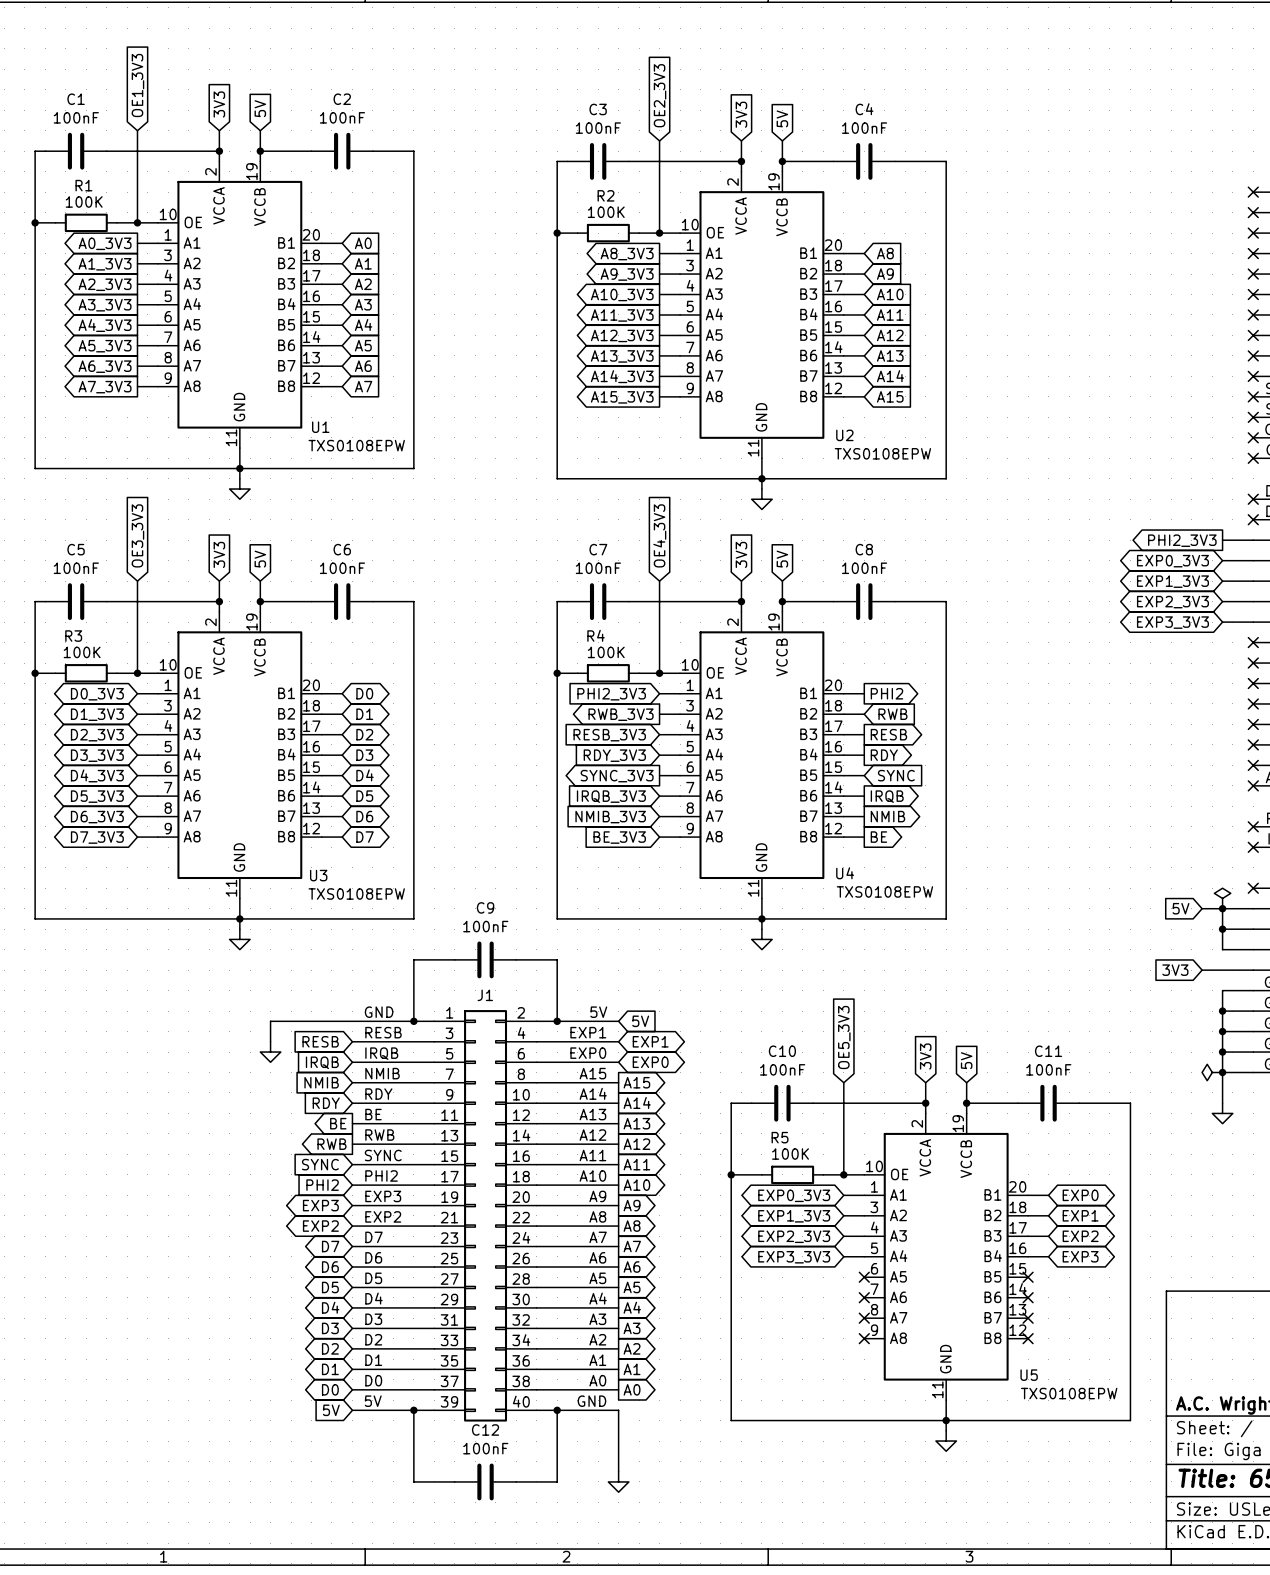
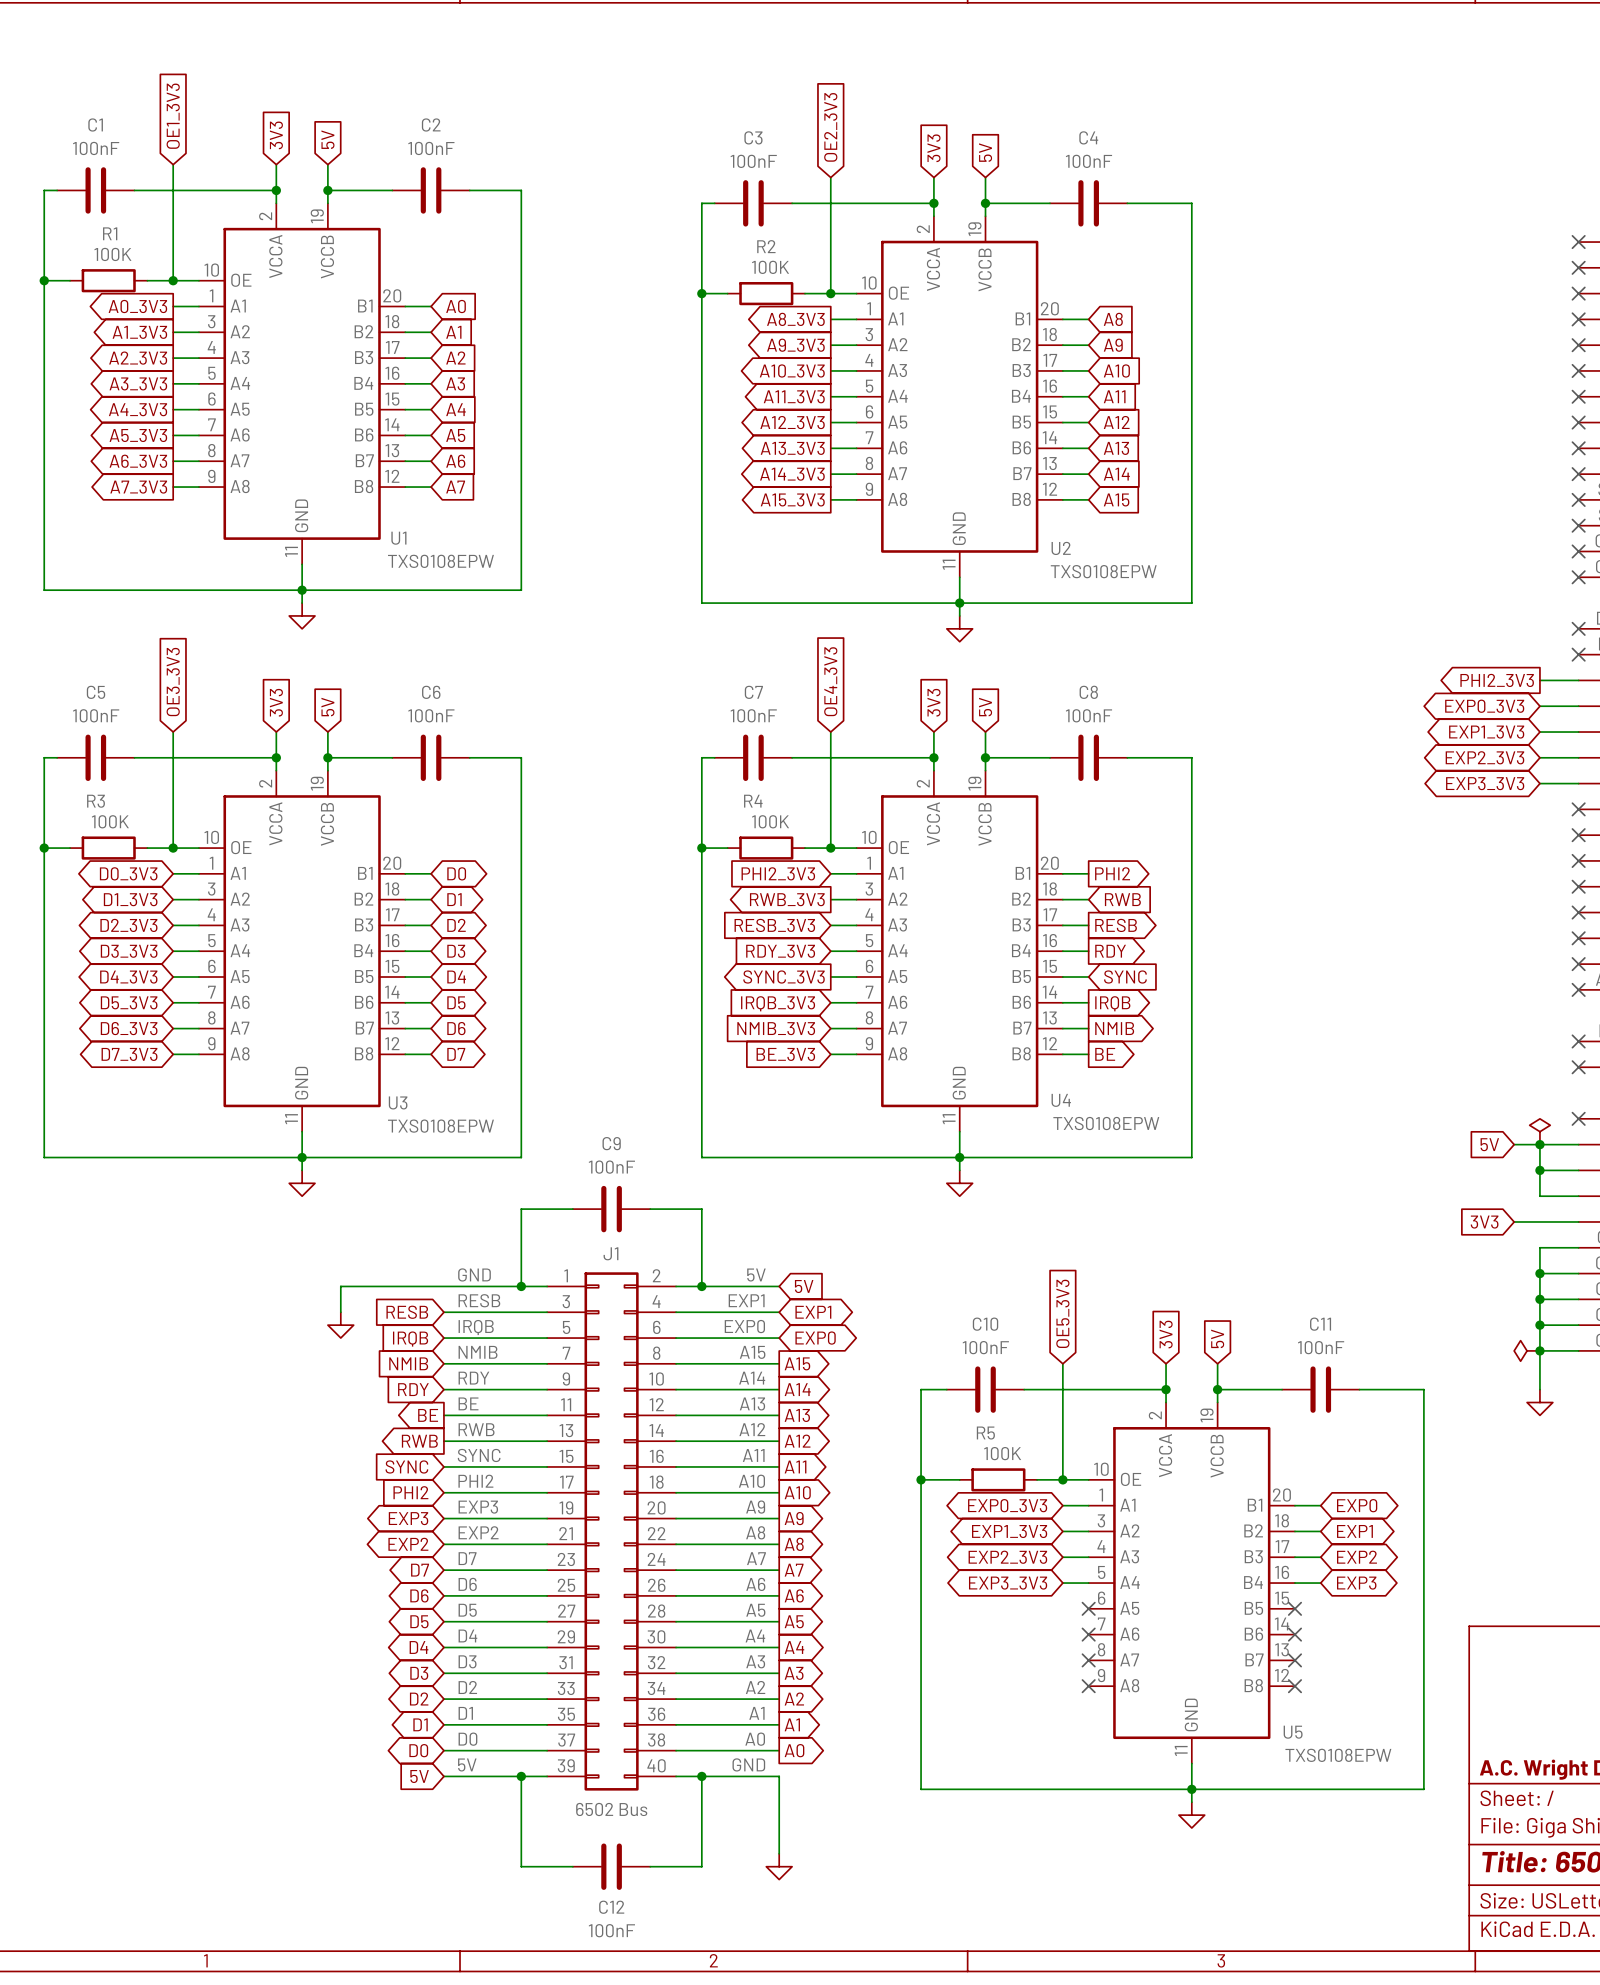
C12 name position: C12 (485, 1429) -> C12 (611, 1907)
J1 value: none -> 6502 Bus (611, 1809)
C12 value position: 100nF (485, 1448) -> 100nF (611, 1930)

